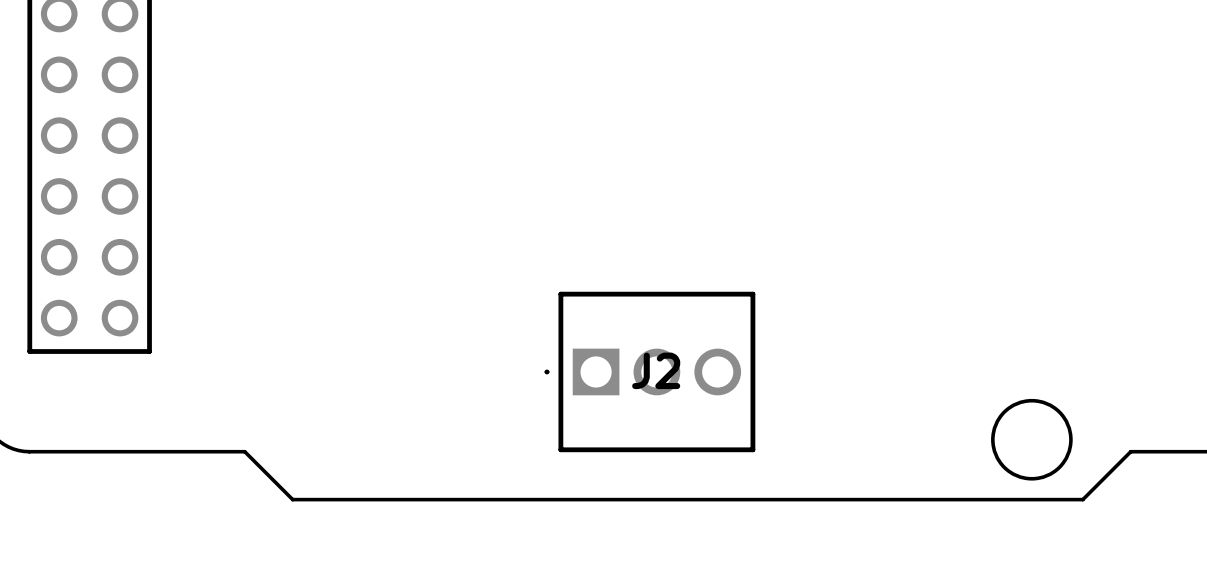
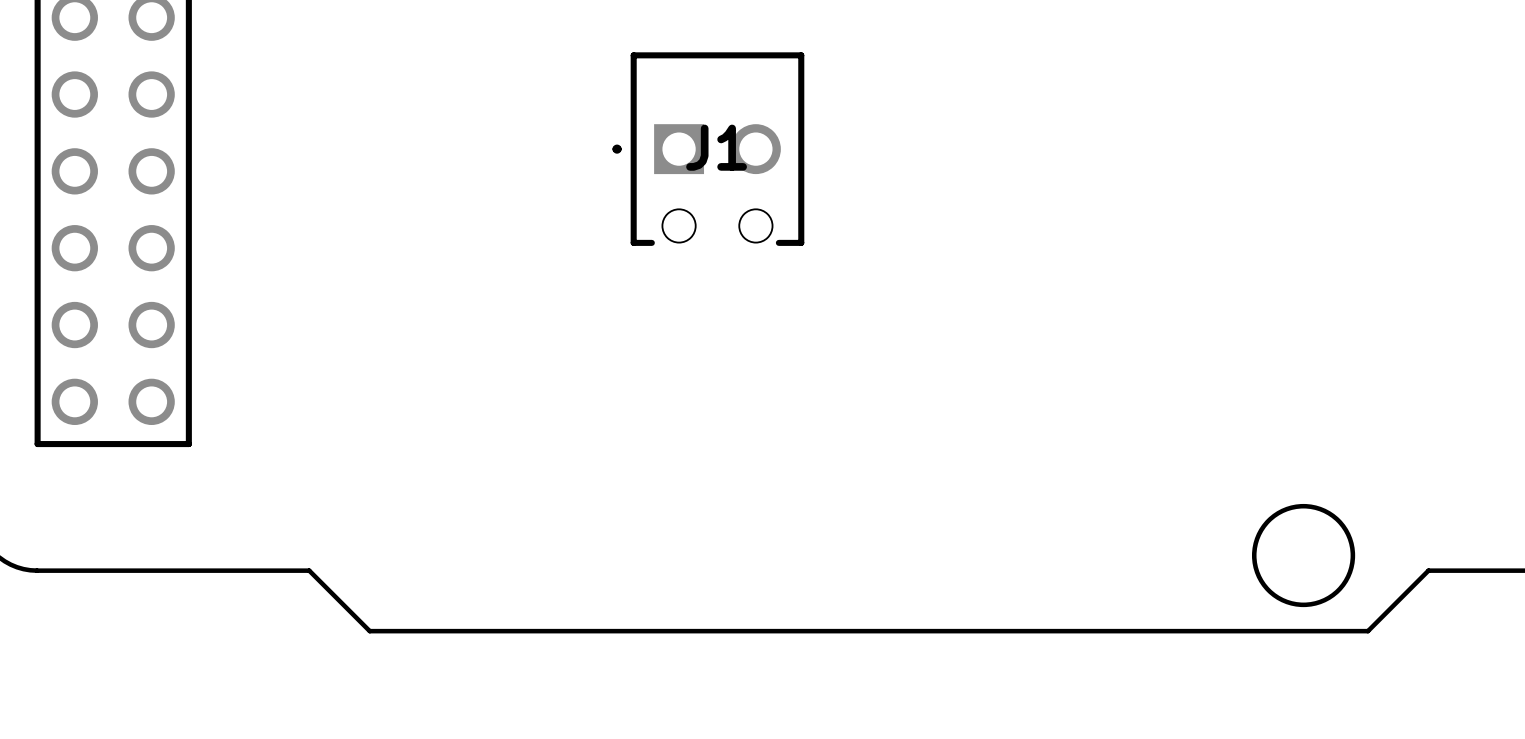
J1: none -> (708, 149)
J2: (649, 371) -> none

